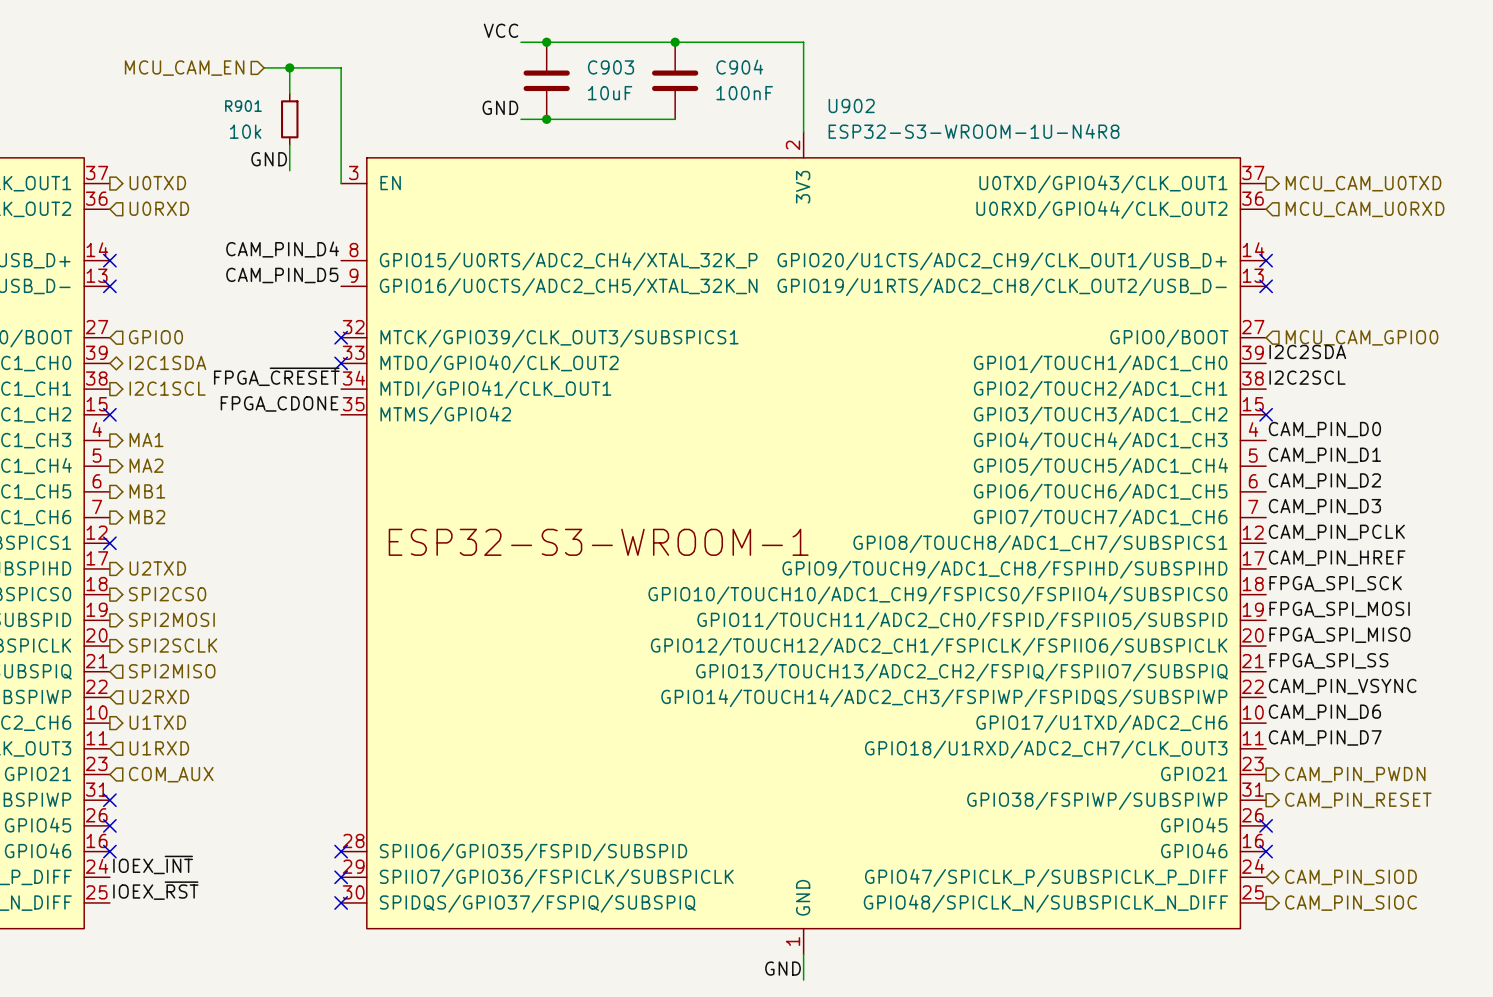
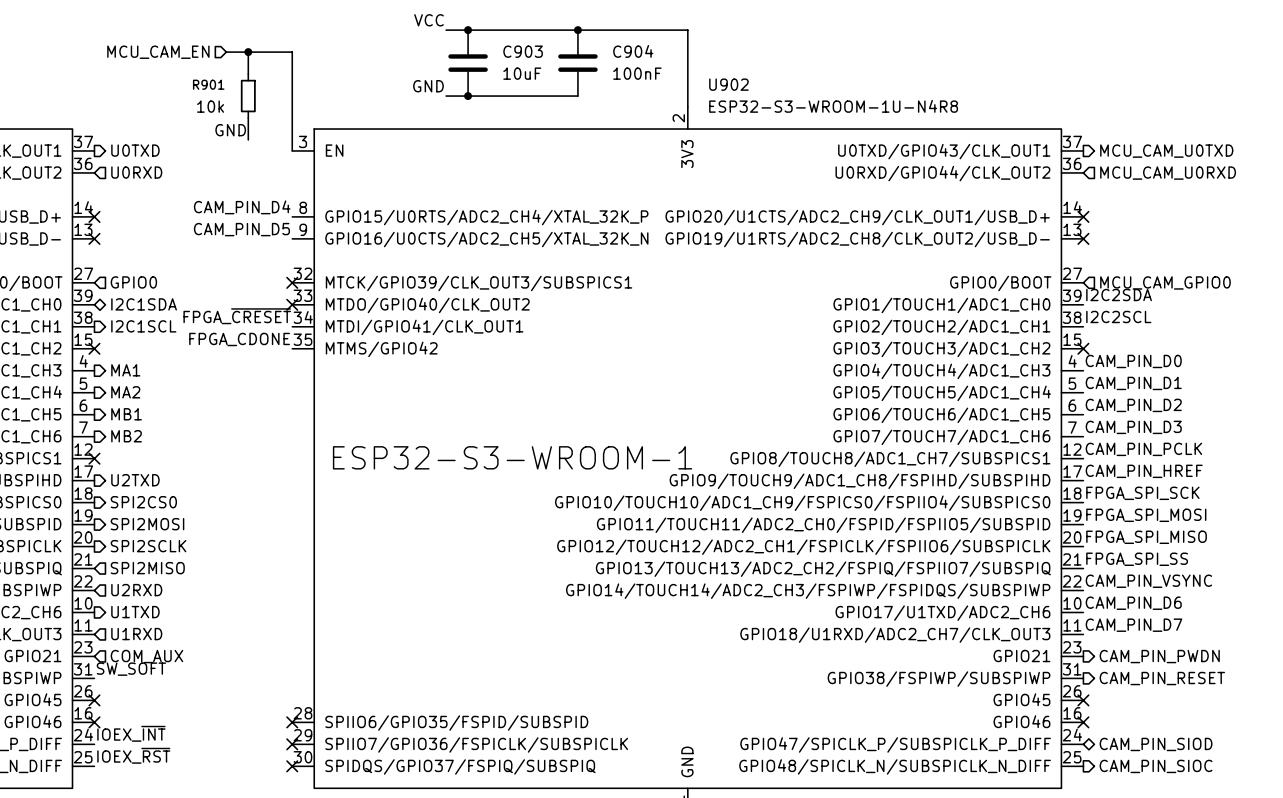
label: none -> SW_SOFT (131, 669)
no-connect mark: (109, 800) -> none

